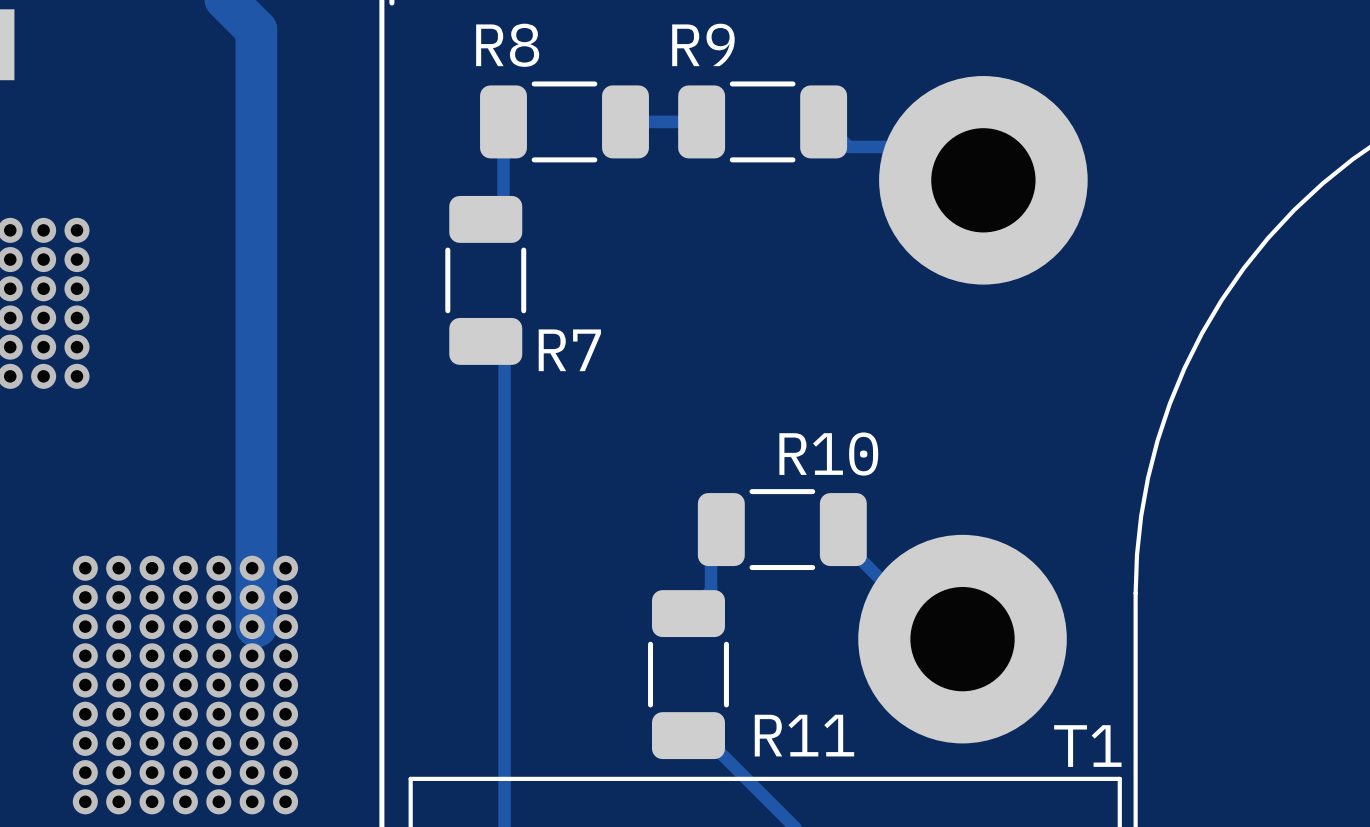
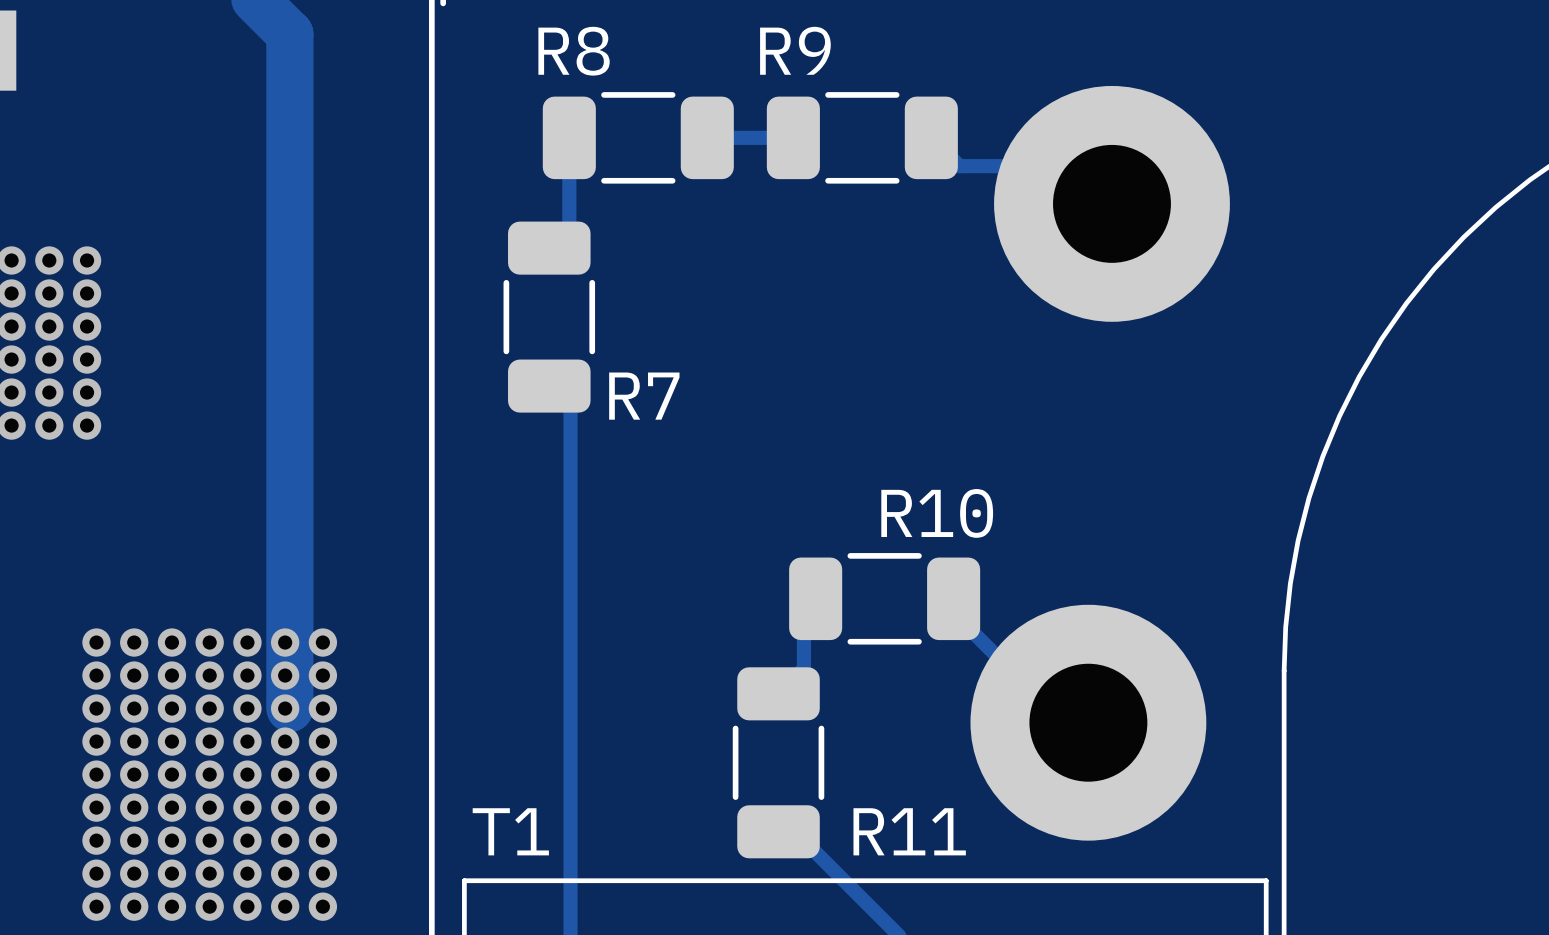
T1 name position: T1 (1087, 746) -> T1 (510, 831)

